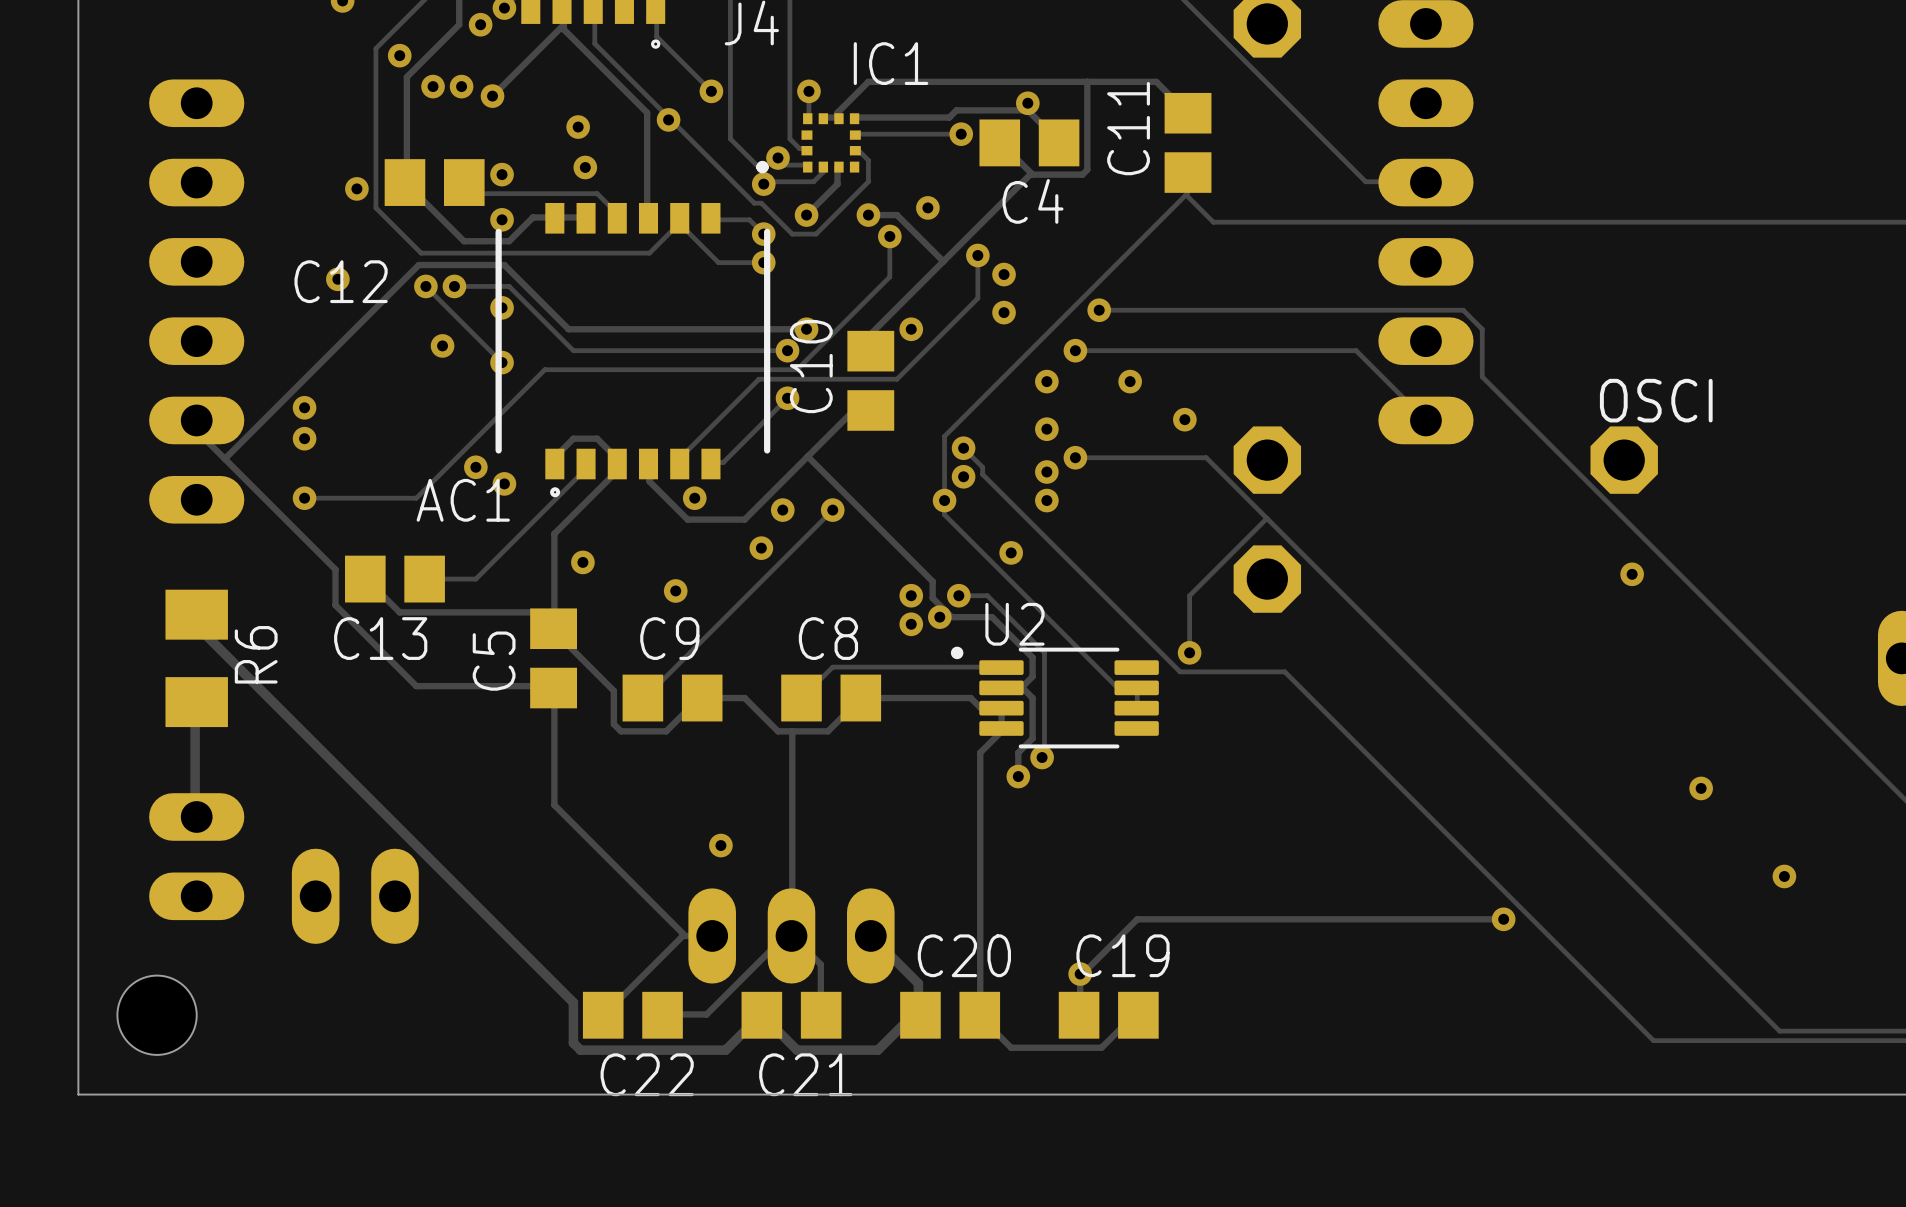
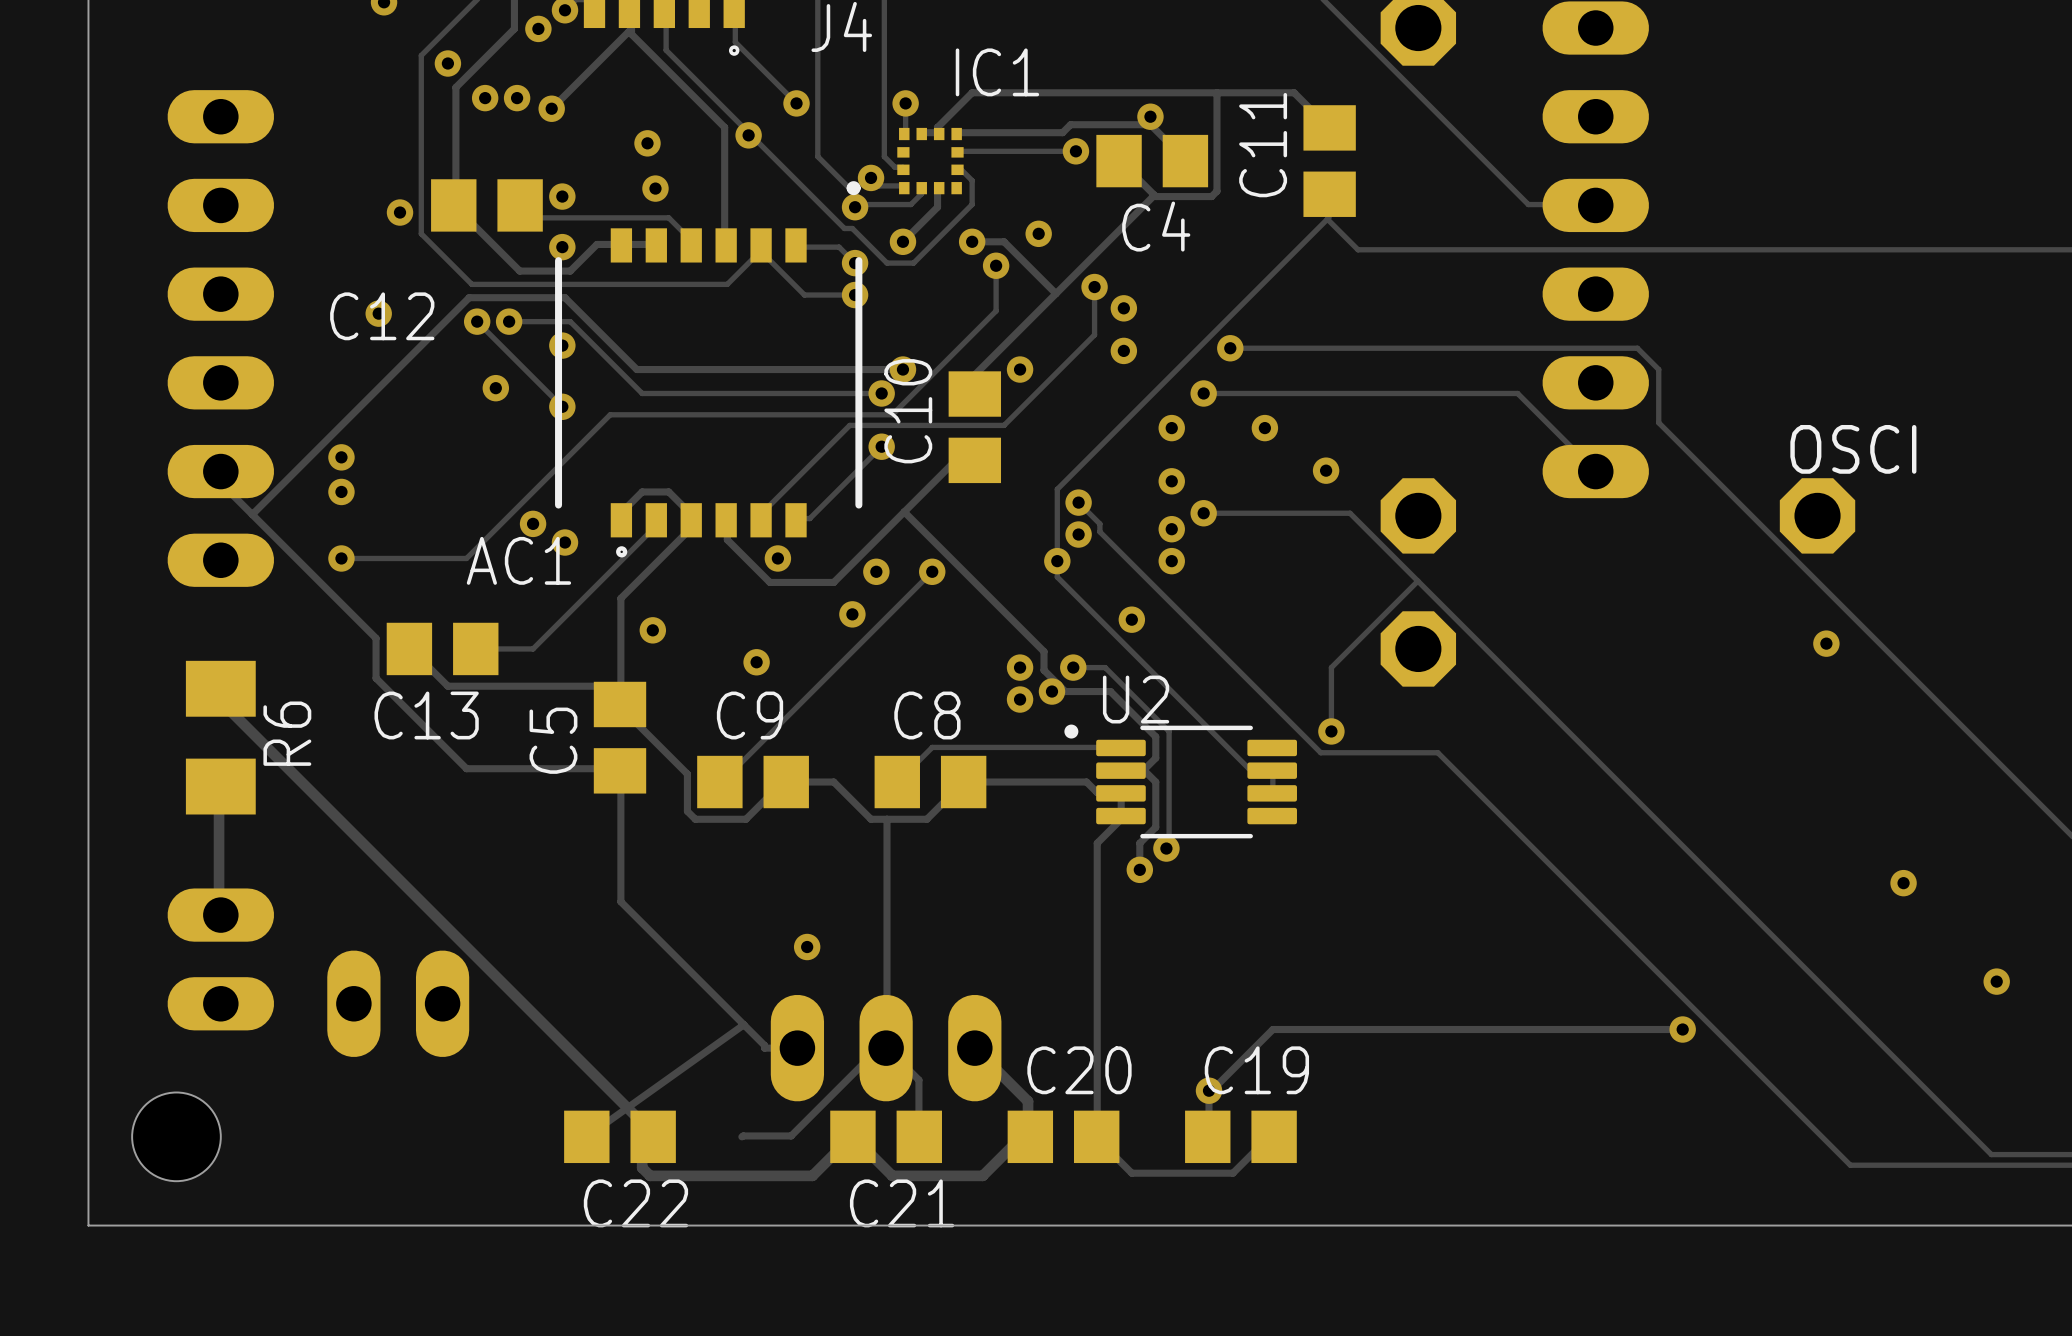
track: none -> (743, 1024) (586, 1136)
track: (682, 935) (603, 1015) -> none
C22 position: (632, 1015) -> (620, 1136)

